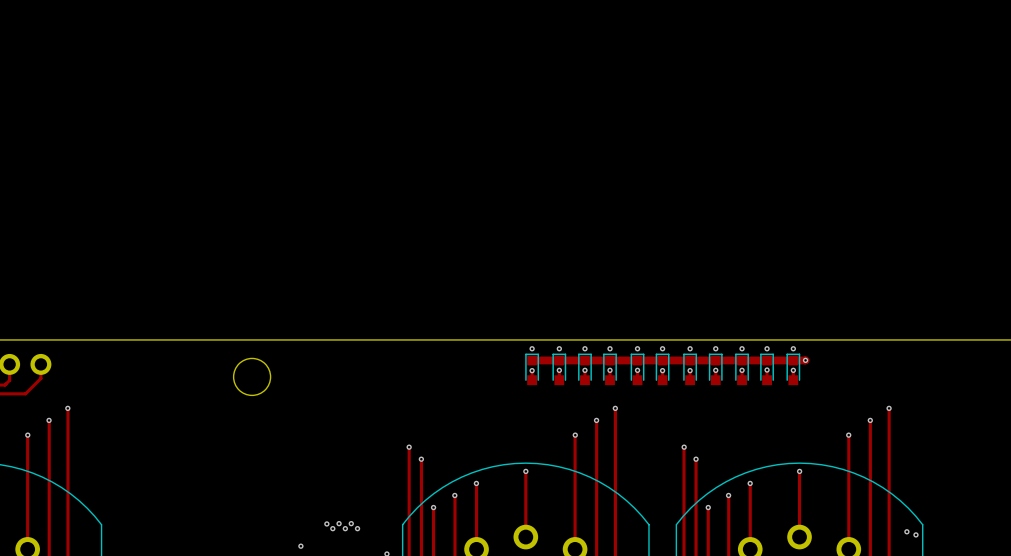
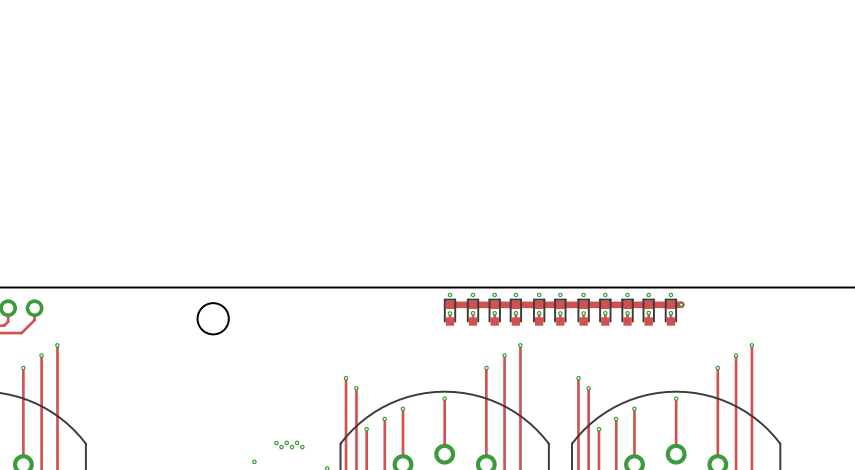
via: (906, 531) -> none
via: (915, 534) -> none

